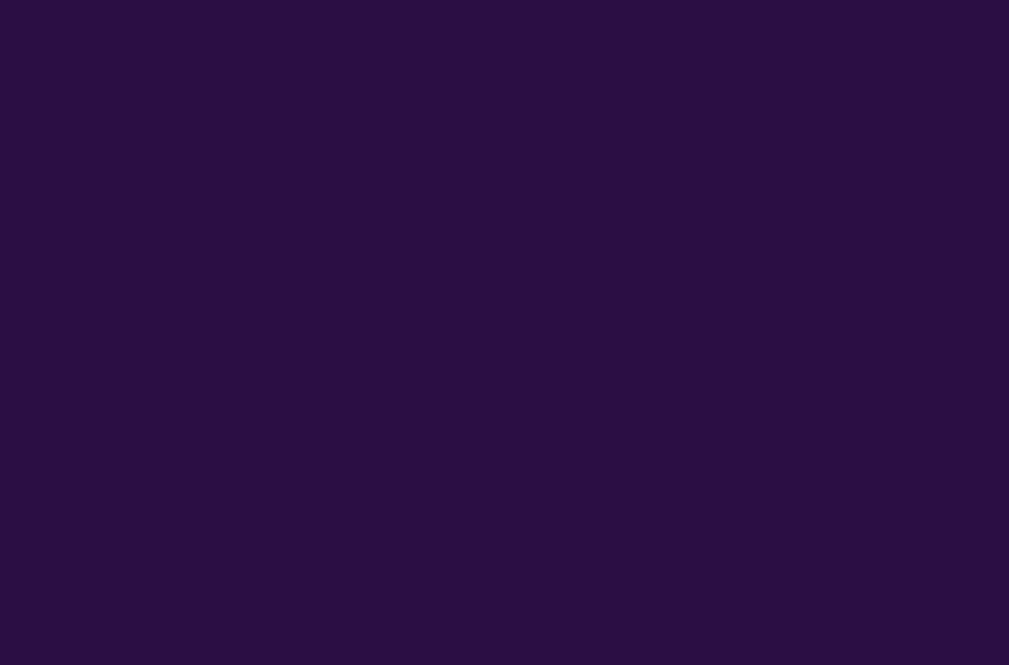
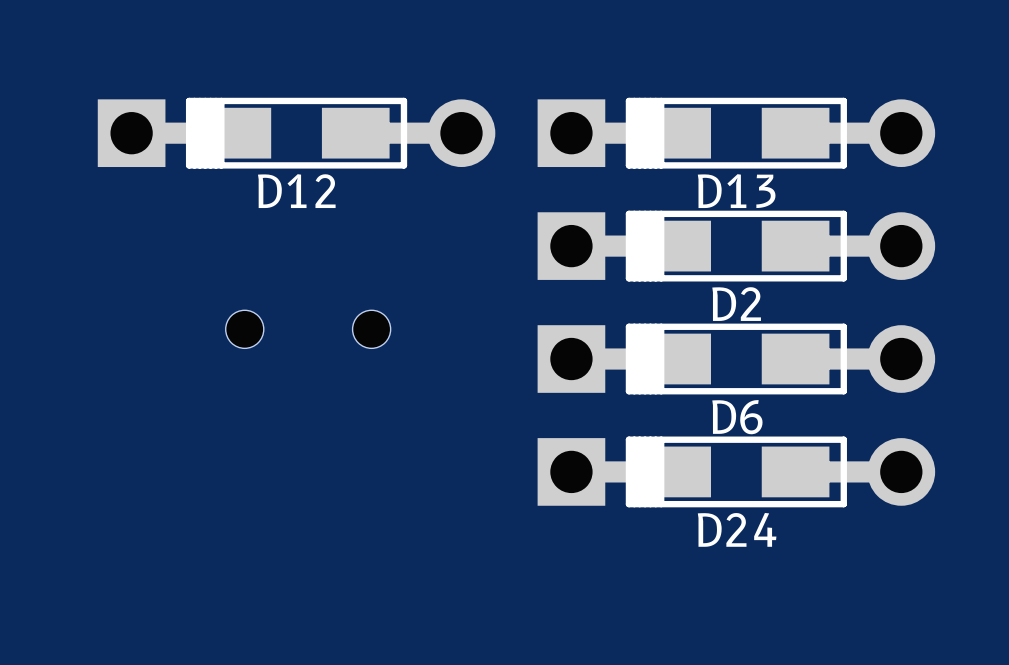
D12: none -> (296, 133)
D13: none -> (736, 133)
D2: none -> (736, 246)
part: none -> (308, 329)
D6: none -> (736, 359)
D24: none -> (736, 471)

